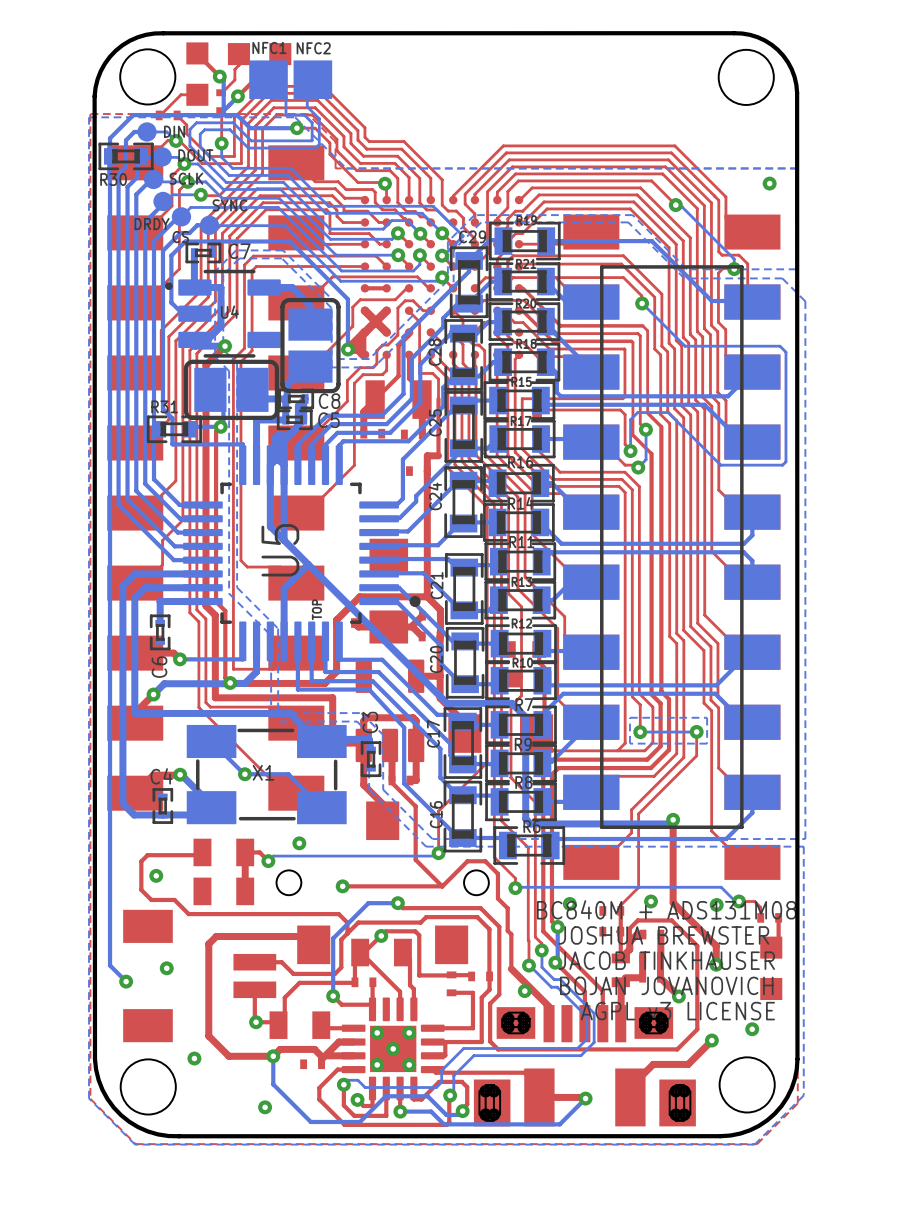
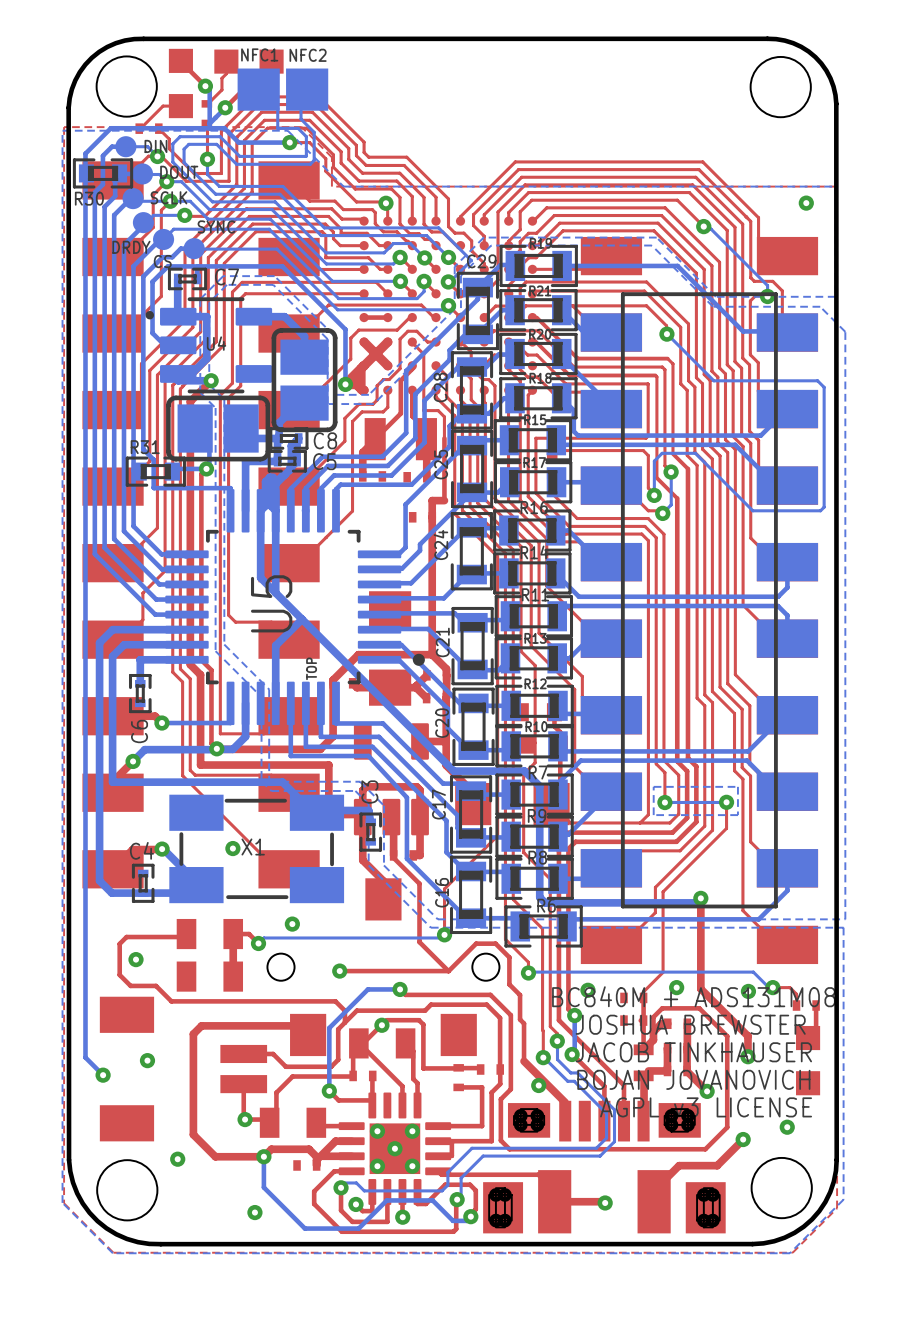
bottom track: (211, 741) (244, 774) (288, 774) (321, 807) -> none
bottom track: (585, 1098) (559, 1124) (443, 1124) (431, 1111) (400, 1111) -> none

